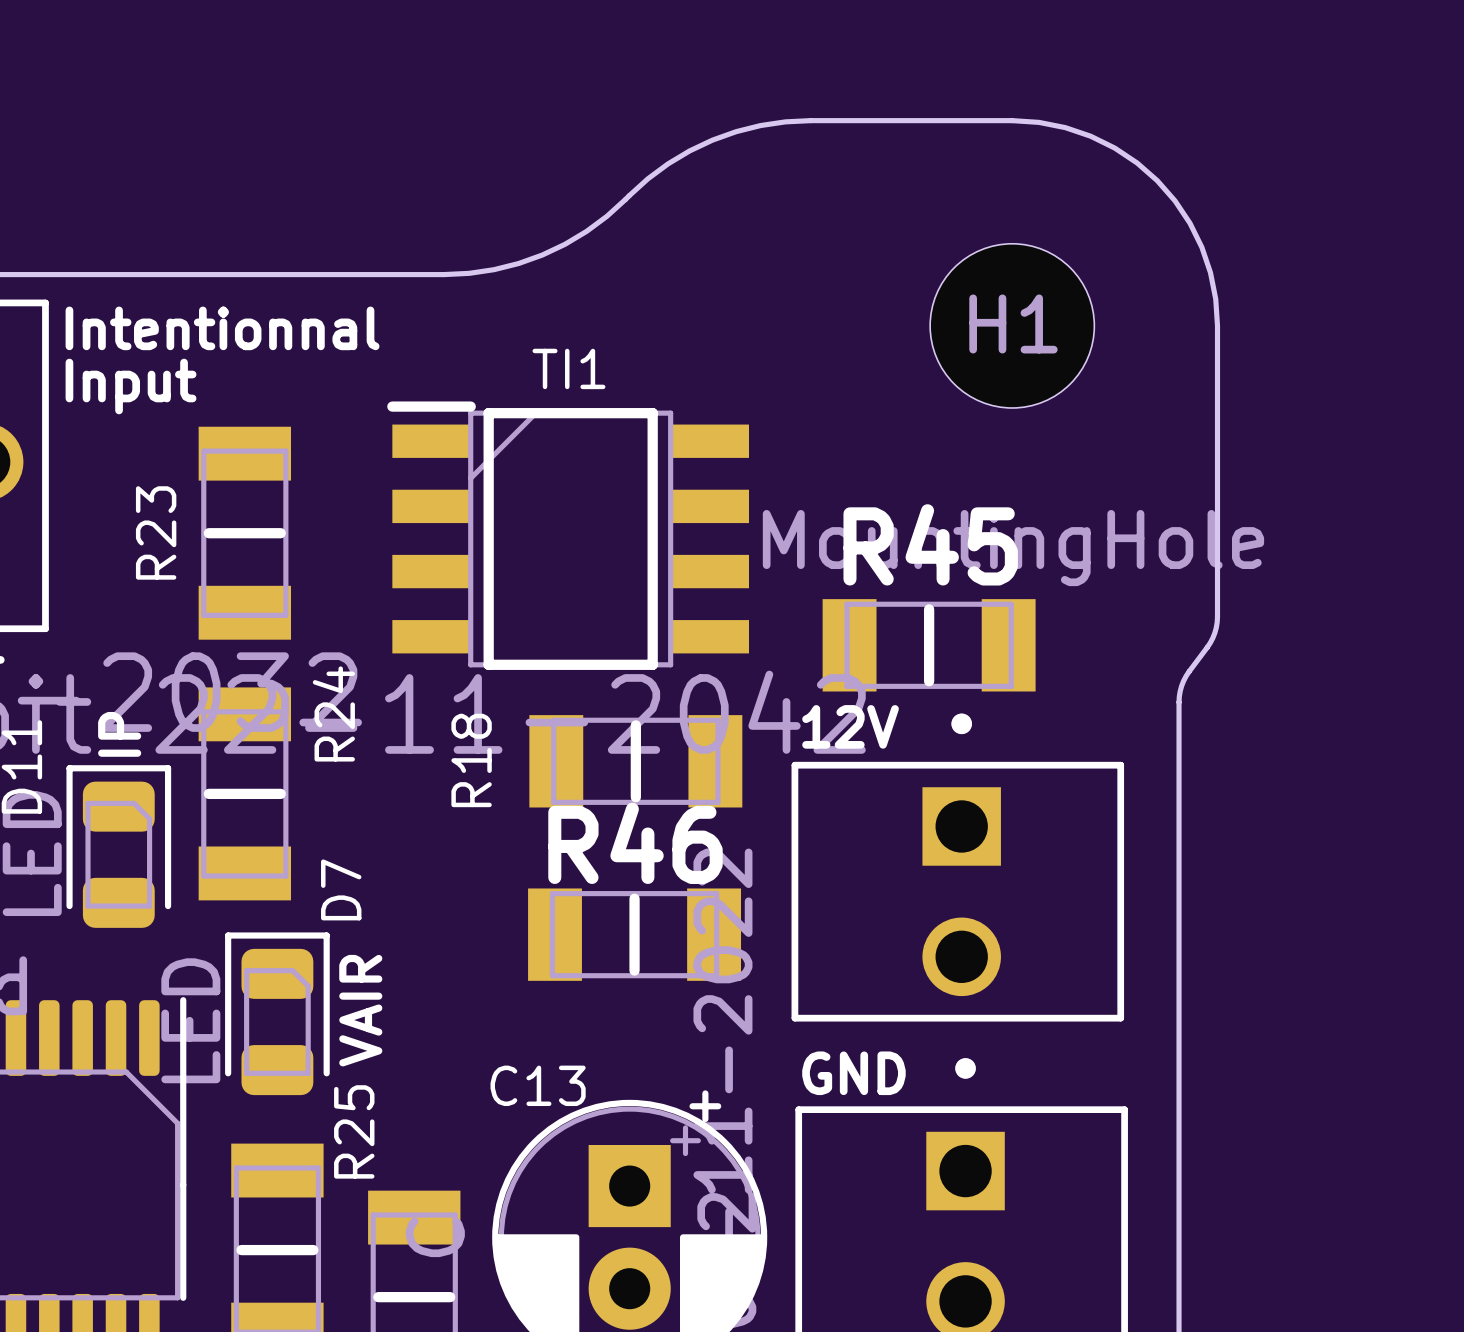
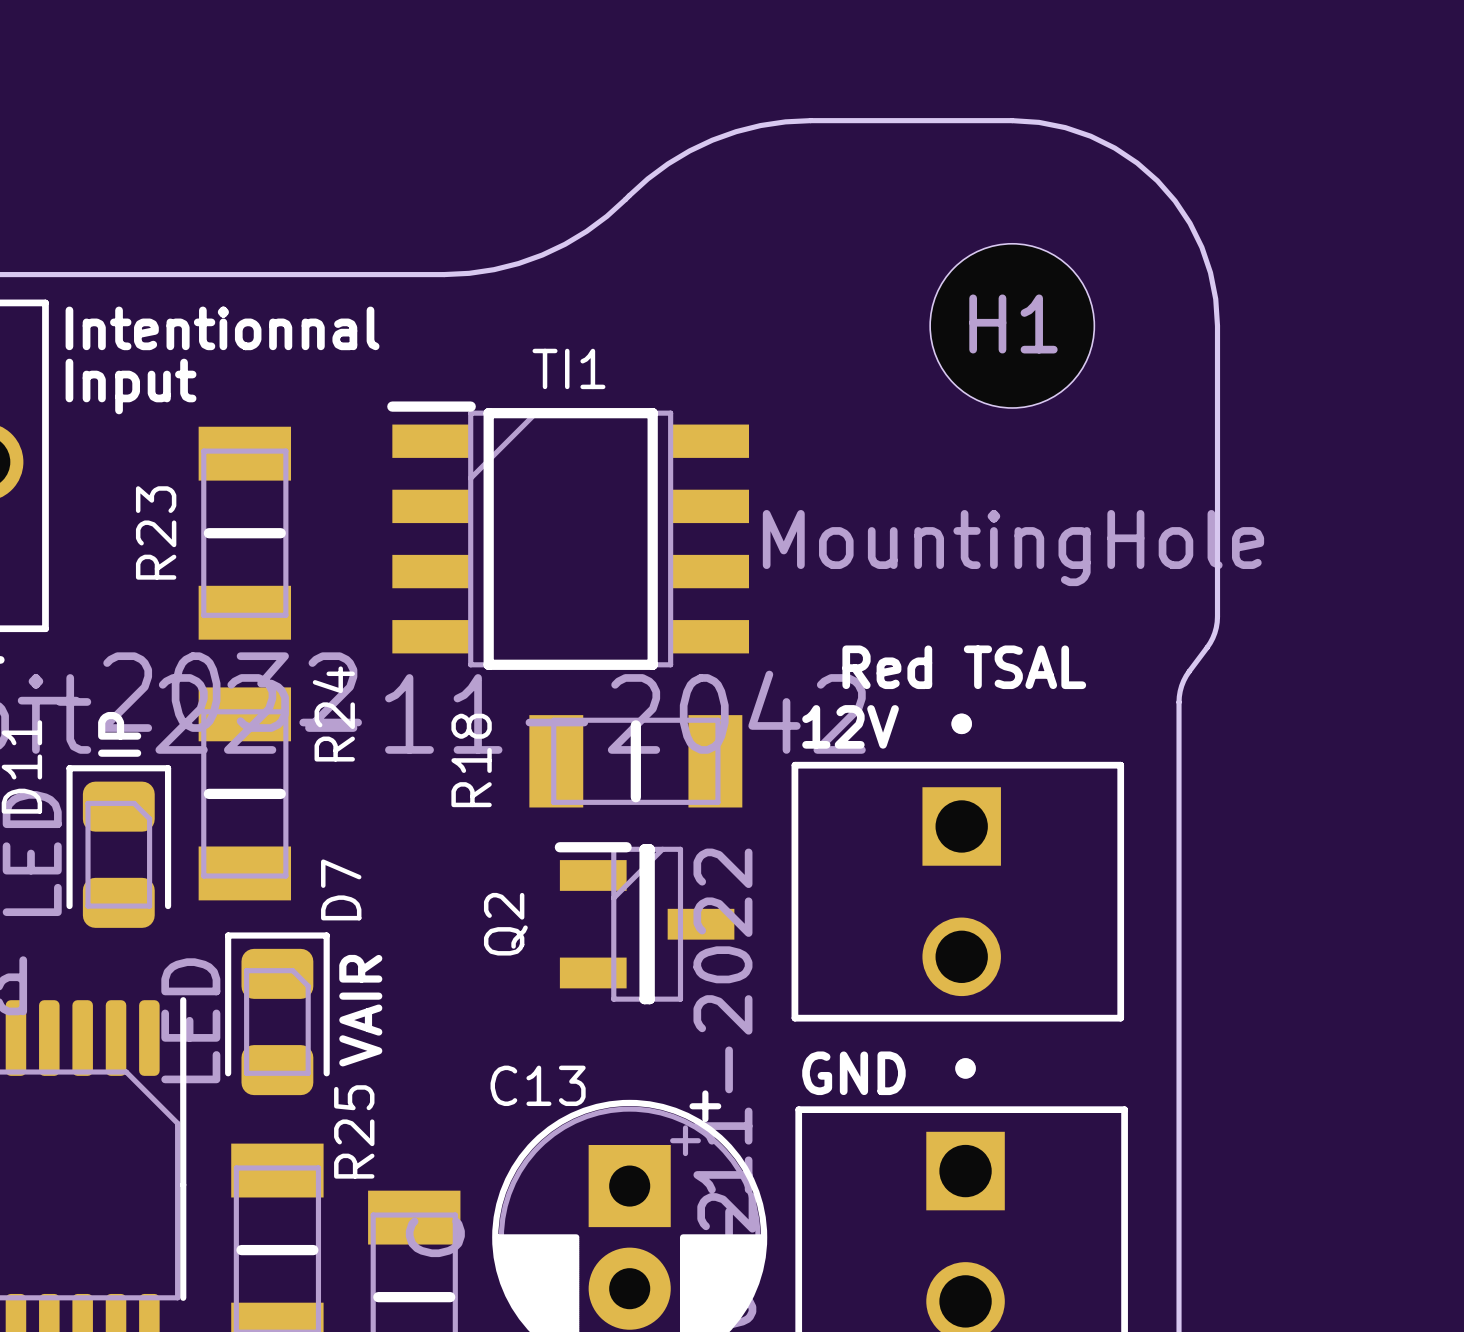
R45: (929, 645) -> none
text: none -> Red TSAL (964, 667)
Q2: none -> (644, 923)
R46: (634, 934) -> none

